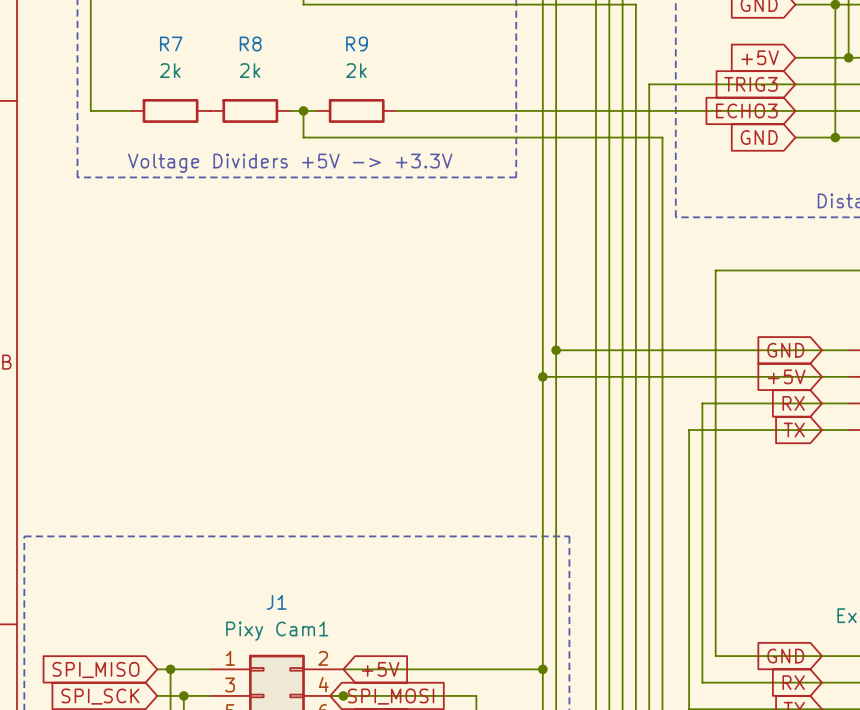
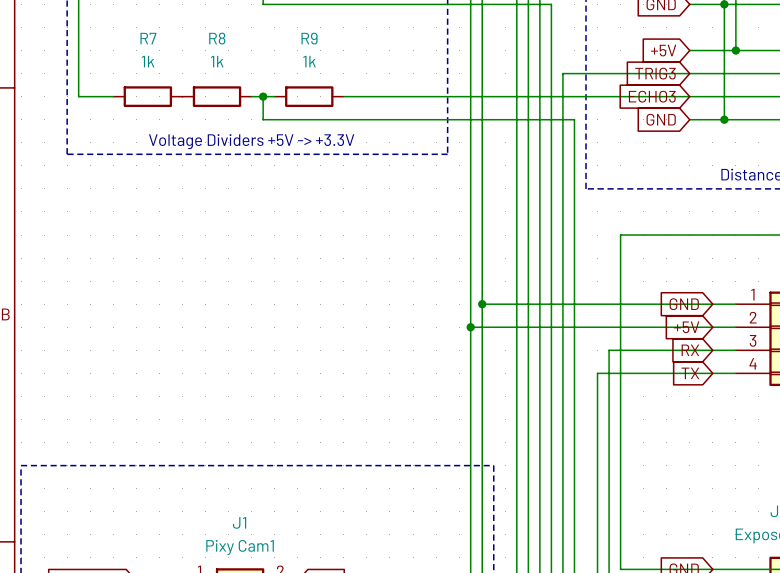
R7 value: 2k (170, 70) -> 1k (148, 61)
R8 value: 2k (250, 70) -> 1k (217, 61)
R9 value: 2k (356, 70) -> 1k (309, 61)

